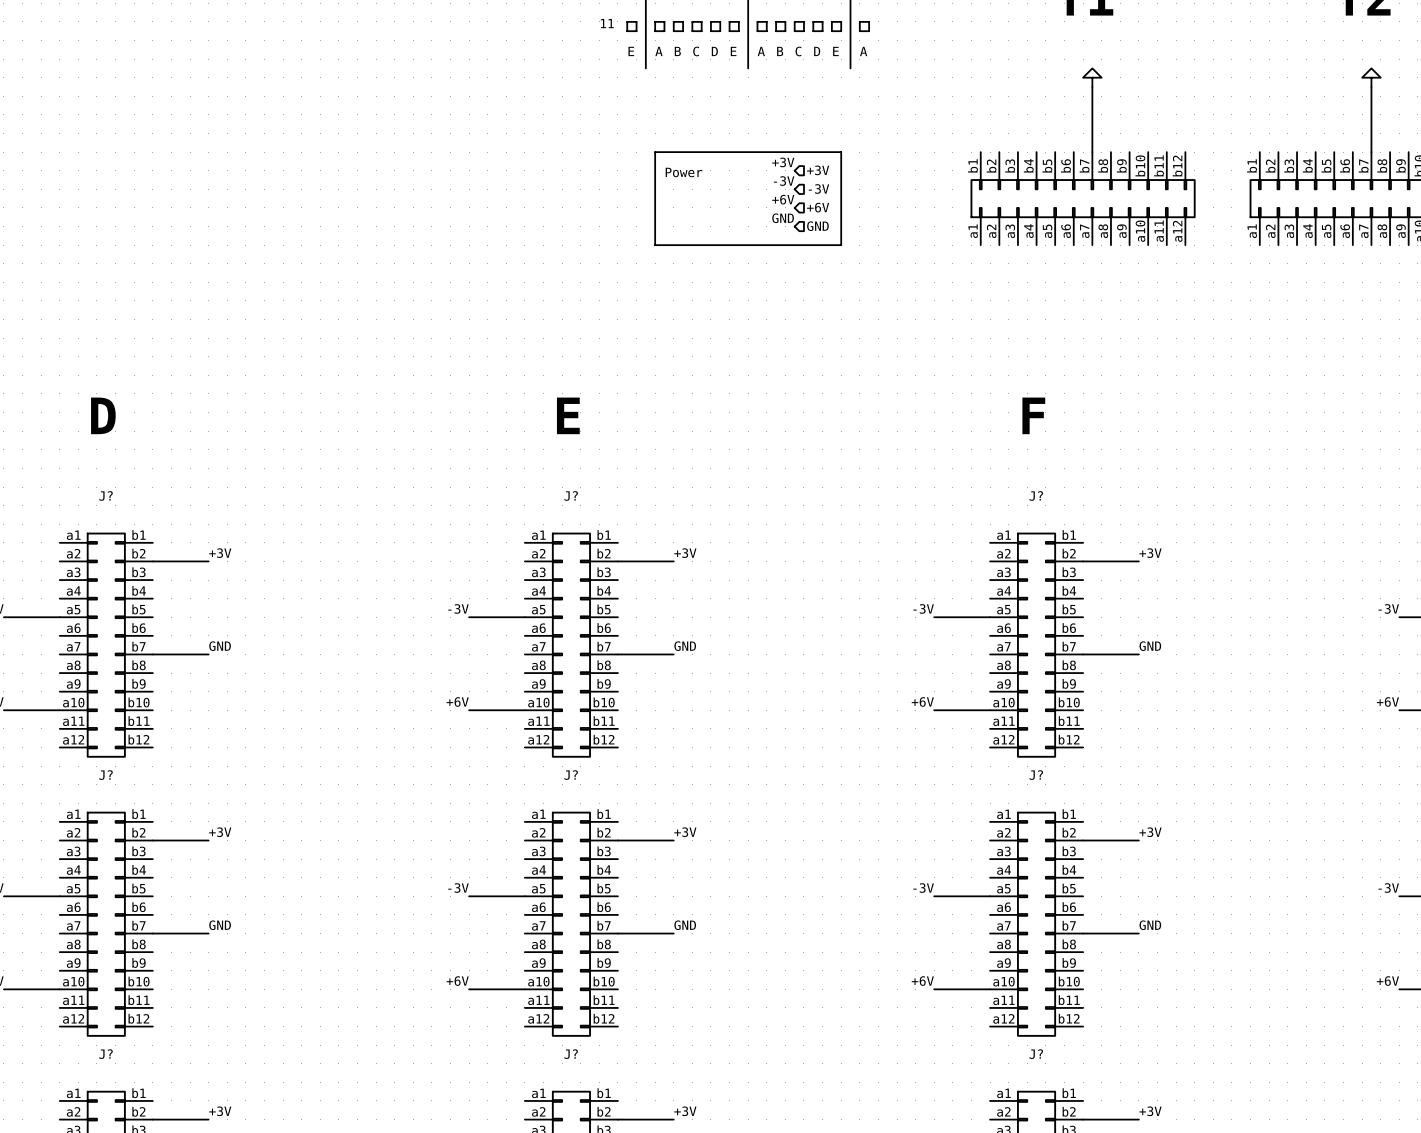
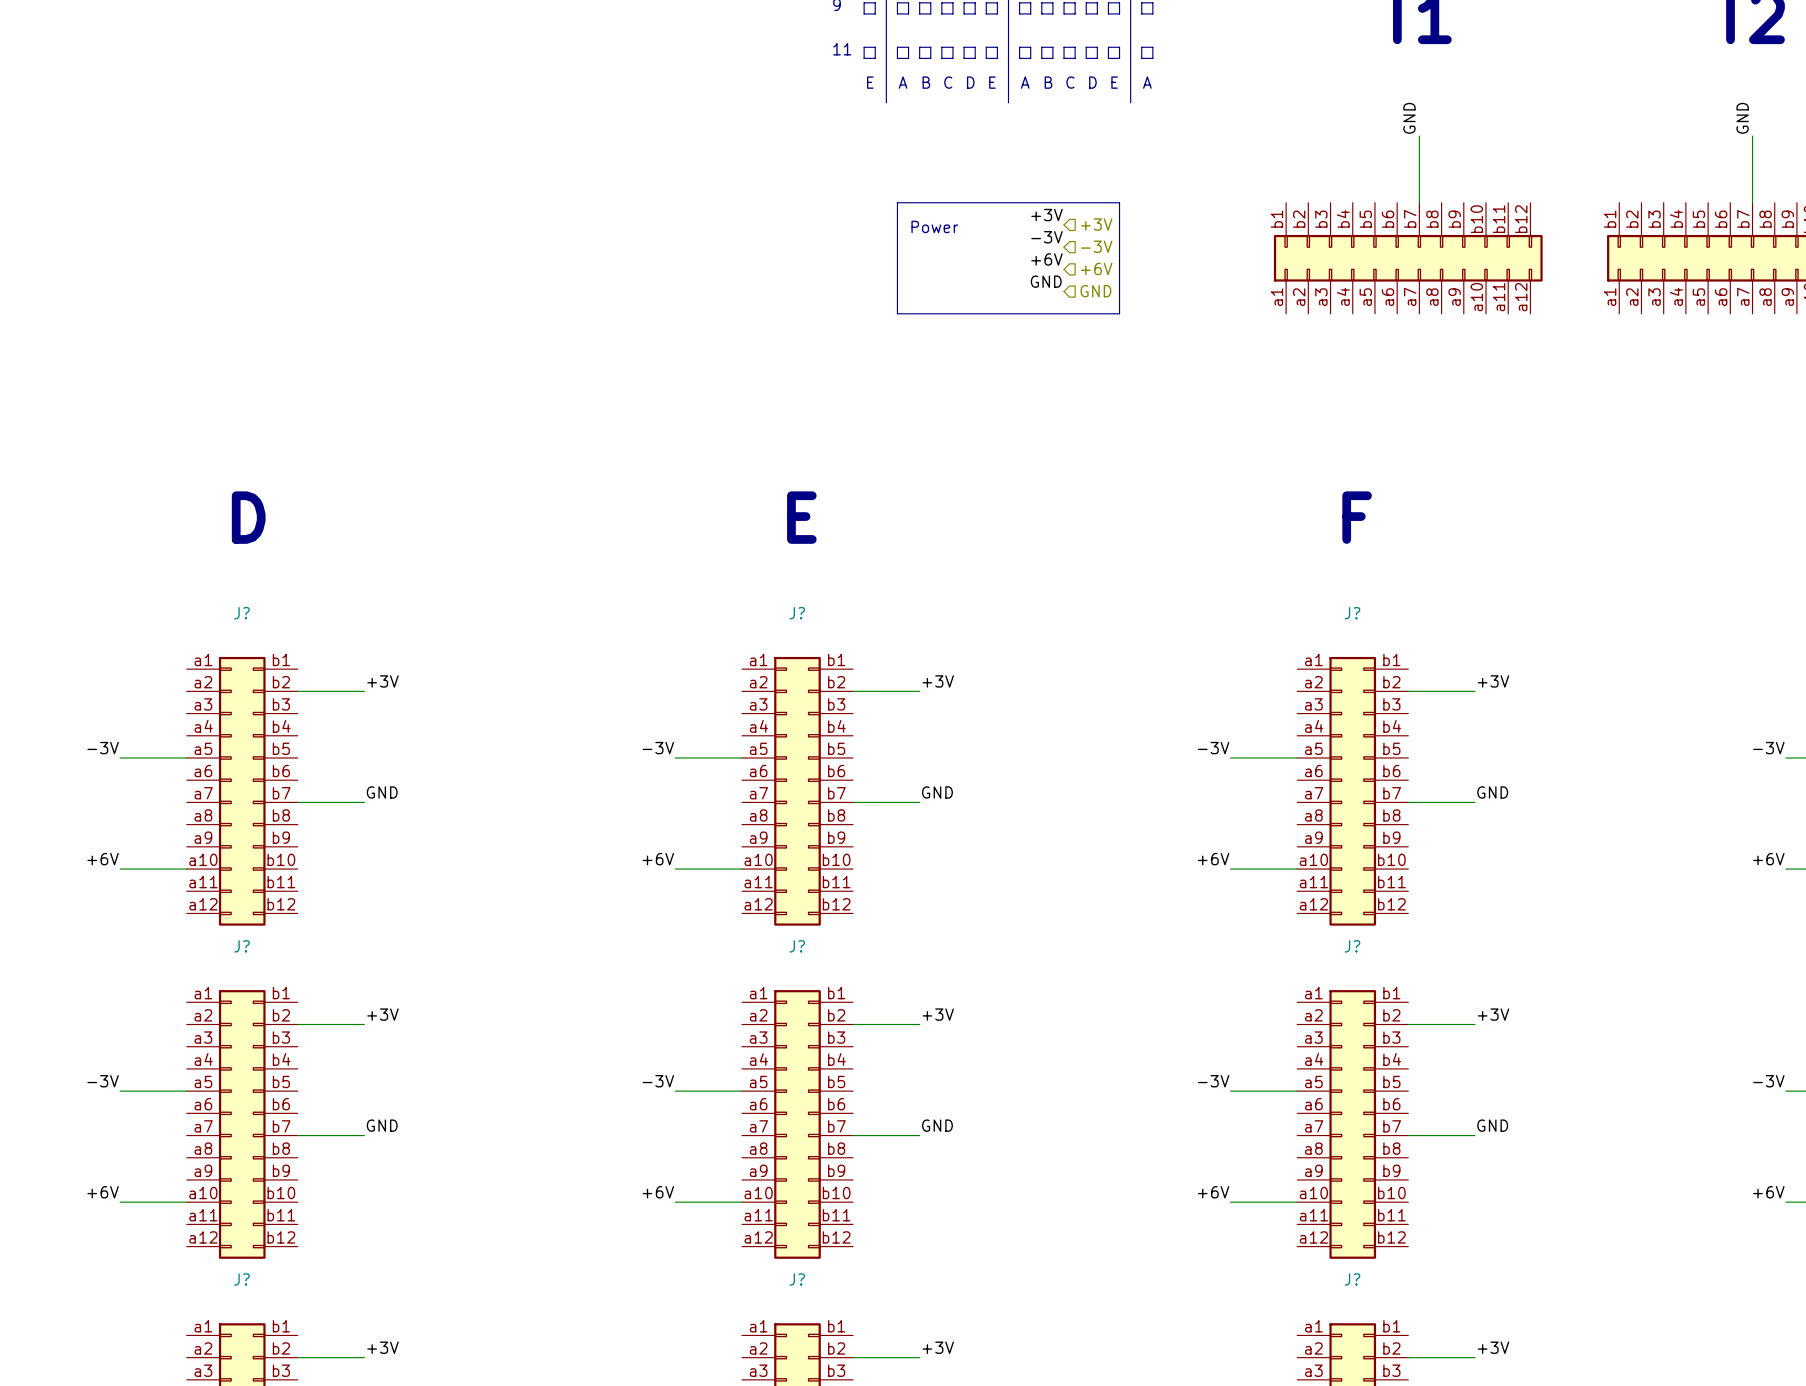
power symbol: (1092, 77) -> none
power symbol: (1371, 77) -> none
label: none -> GND (1409, 118)
label: none -> GND (1742, 118)
wire: (1092, 87) (1092, 96) -> none
wire: (1371, 87) (1371, 96) -> none

